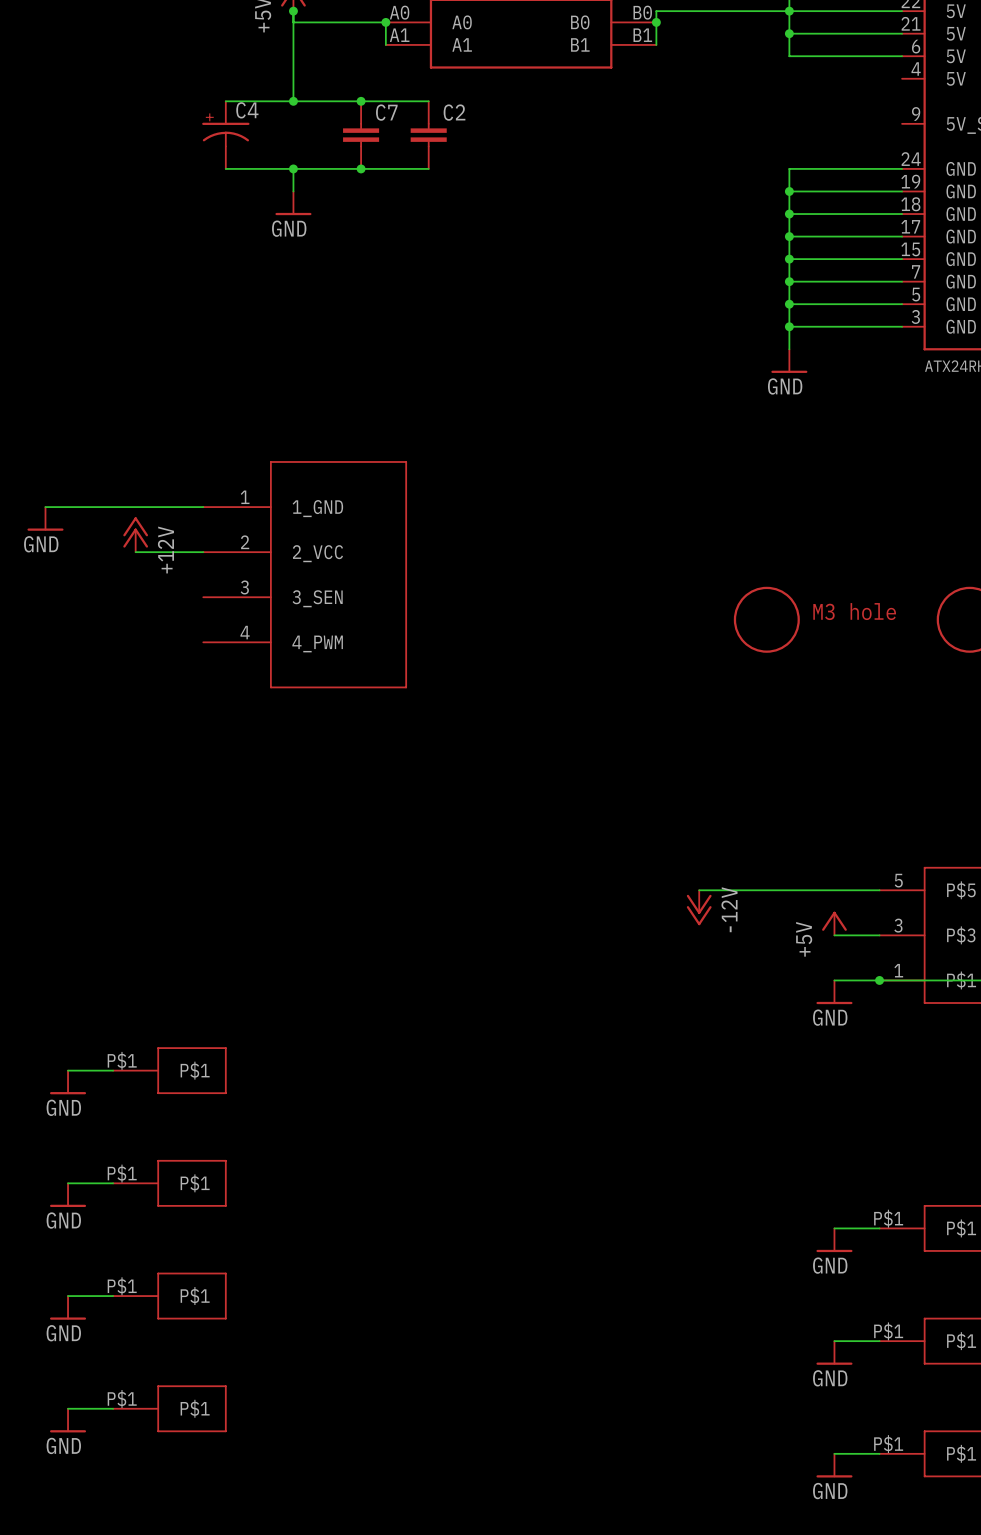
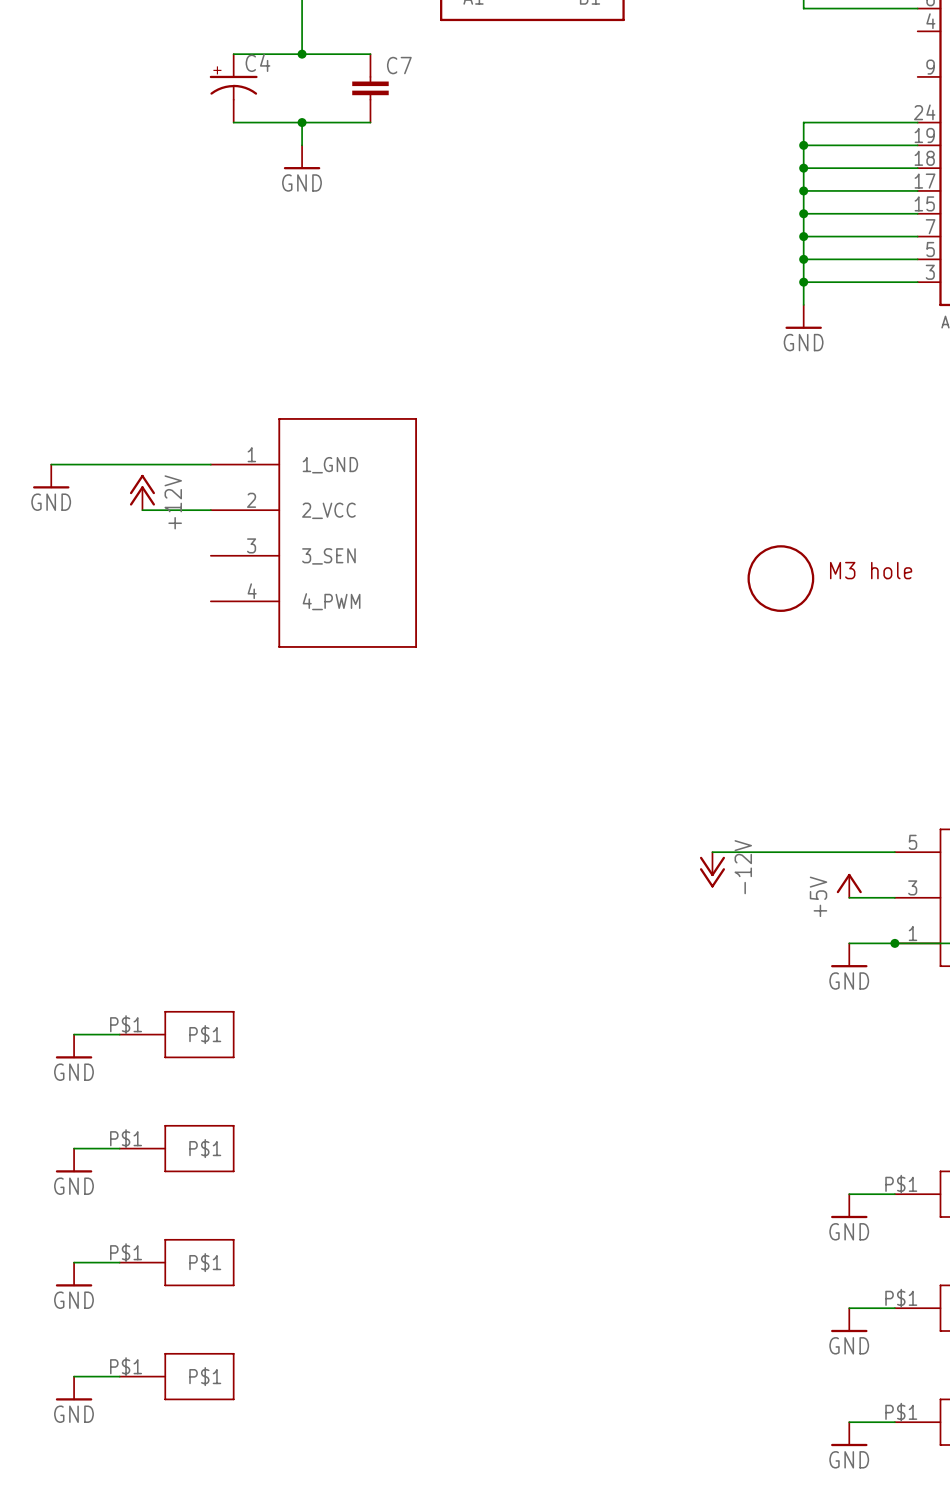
wire: (361, 101) (428, 101) -> none
junction: (361, 101) -> none
C2: (428, 135) -> none
wire: (361, 168) (428, 168) -> none
junction: (361, 168) -> none

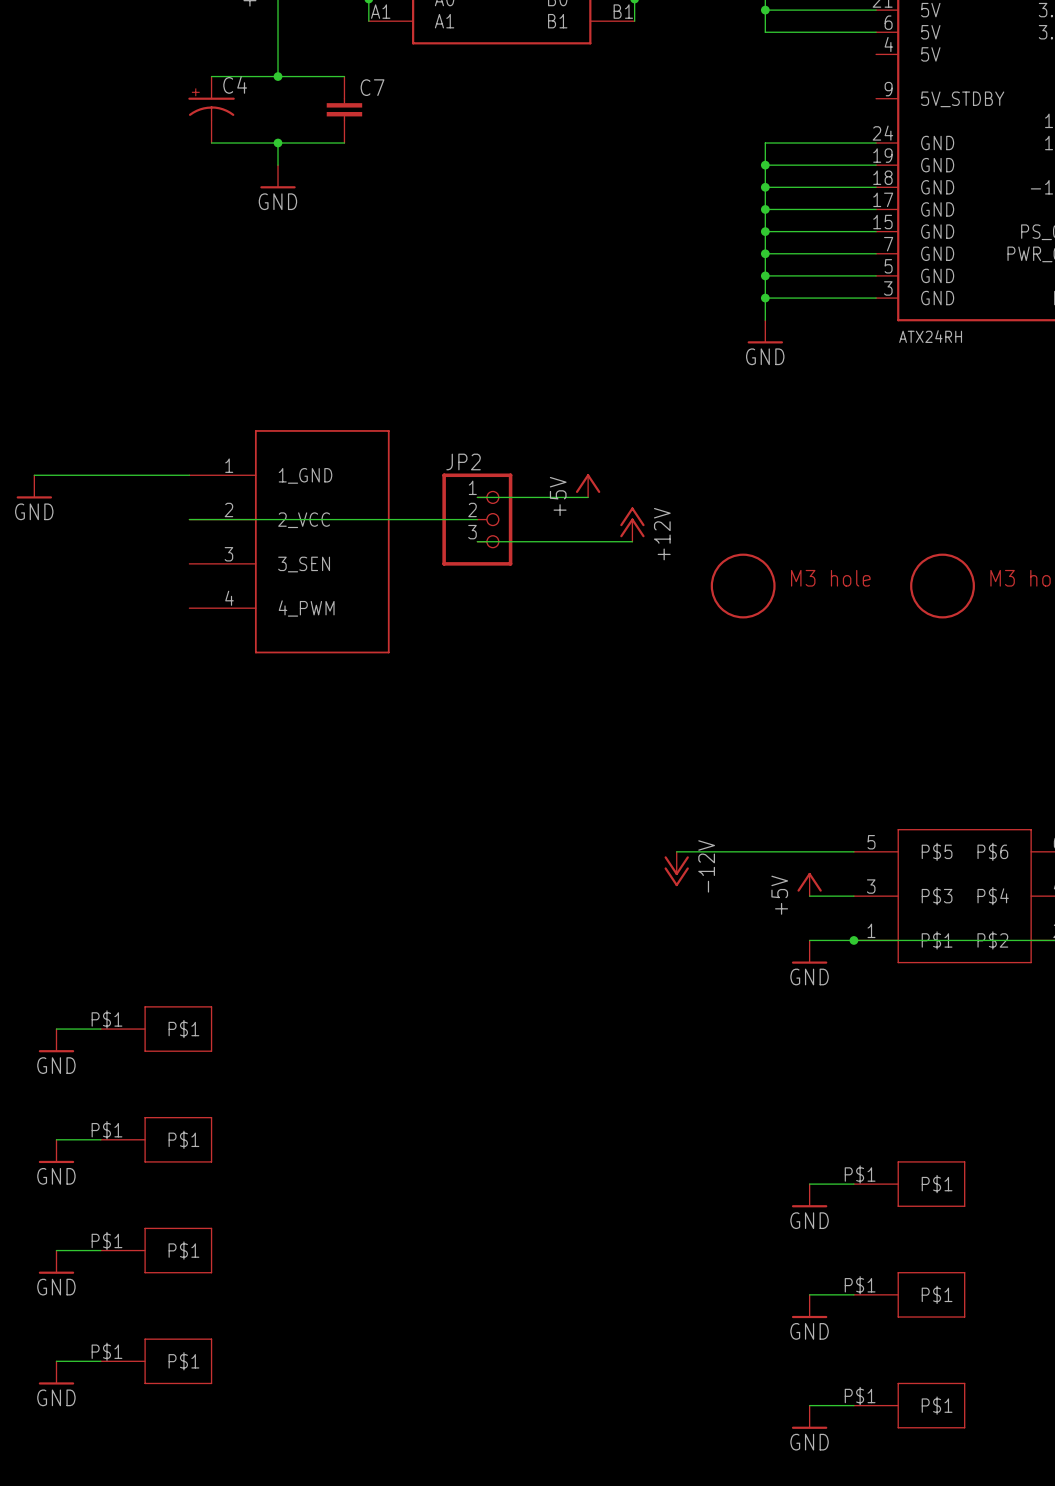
power symbol: none -> +5V (588, 485)
wire: none -> (477, 497) (588, 497)
power symbol: +12V (142, 492) -> none
wire: (142, 510) (210, 510) -> (477, 519) (189, 519)
JP2: none -> (477, 519)
power symbol: none -> +12V (632, 524)
wire: none -> (477, 541) (632, 541)

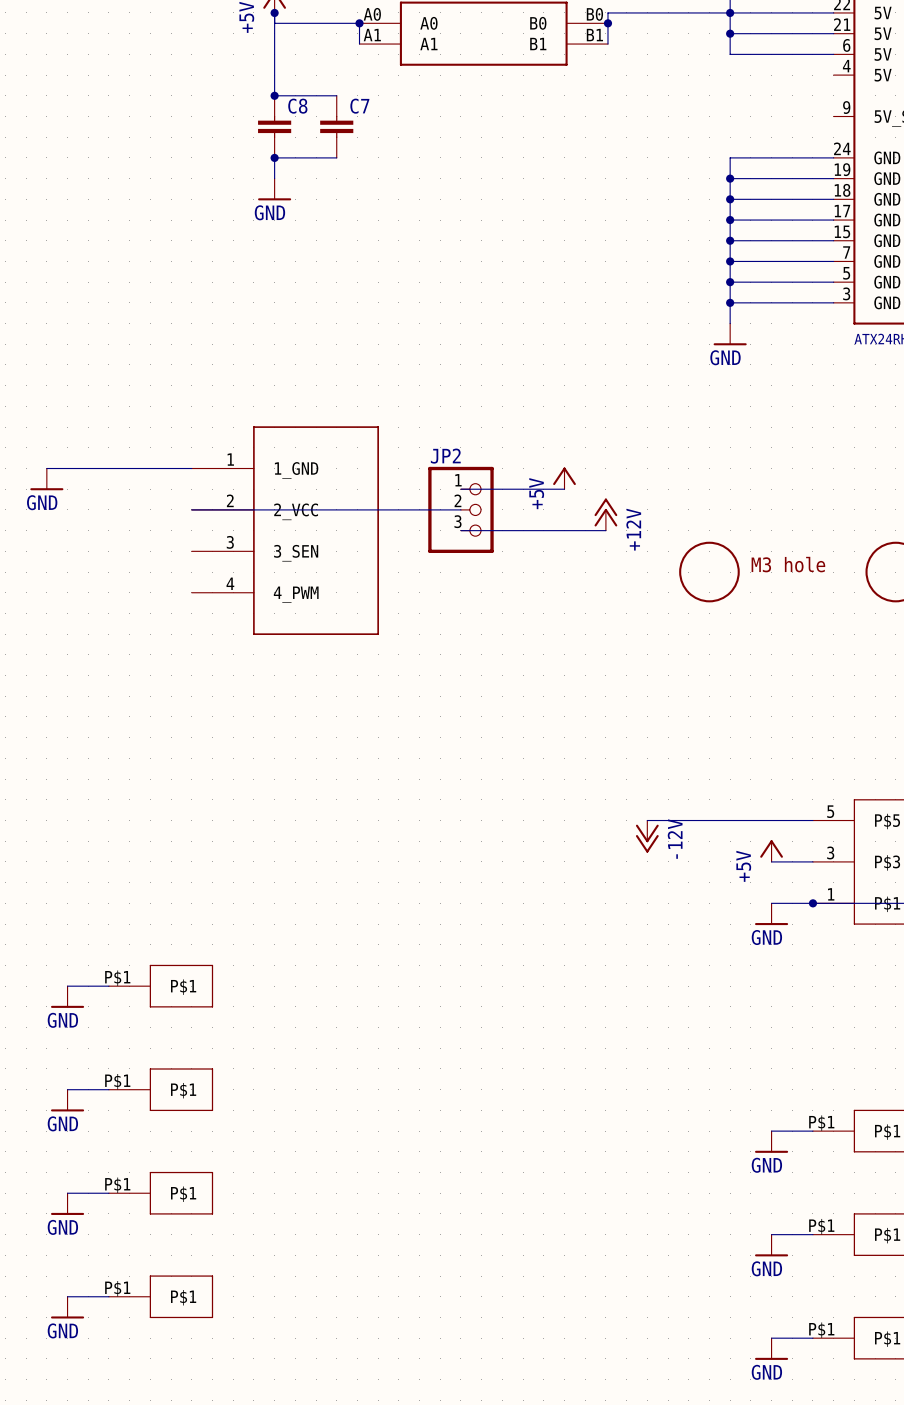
wire: (211, 76) (278, 76) -> none
C4: (211, 109) -> none
C8: none -> (274, 126)
wire: (211, 143) (278, 143) -> none

